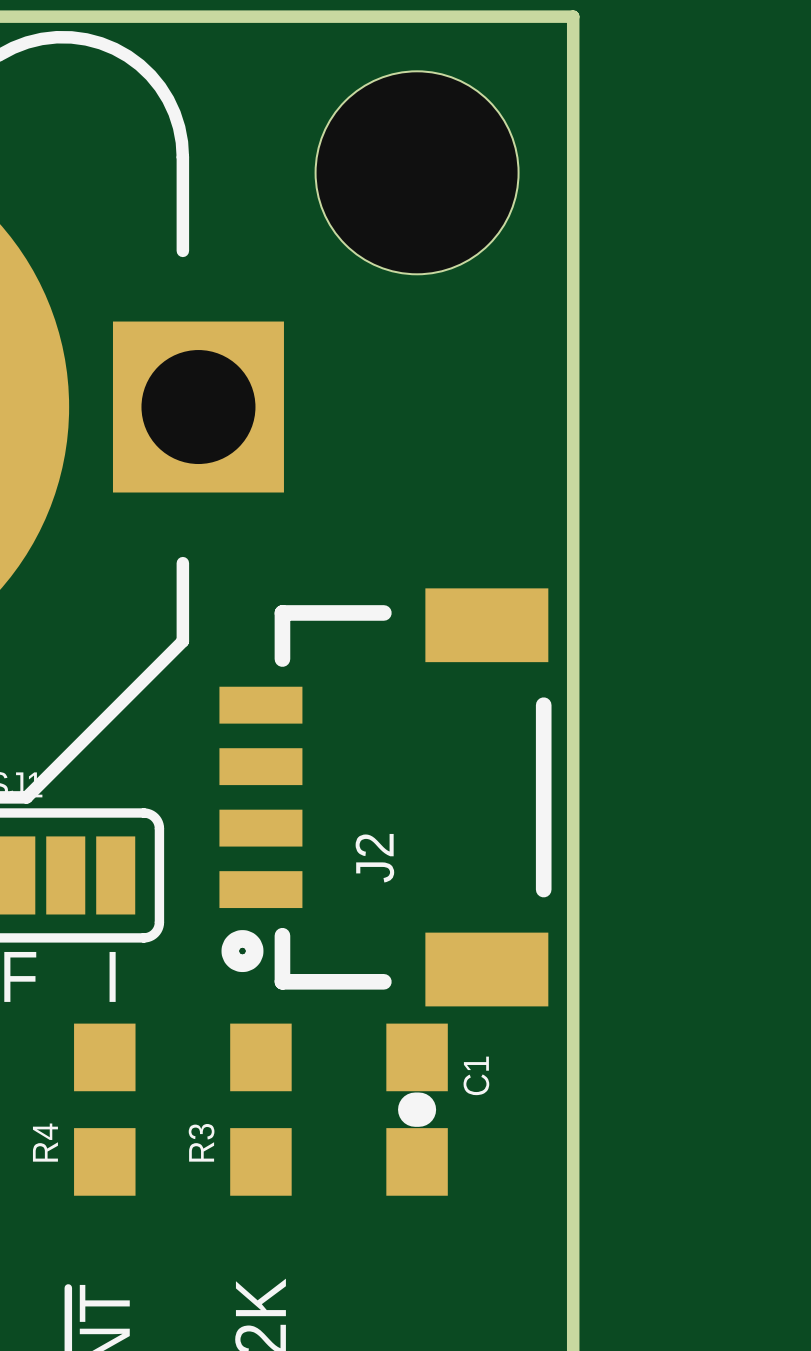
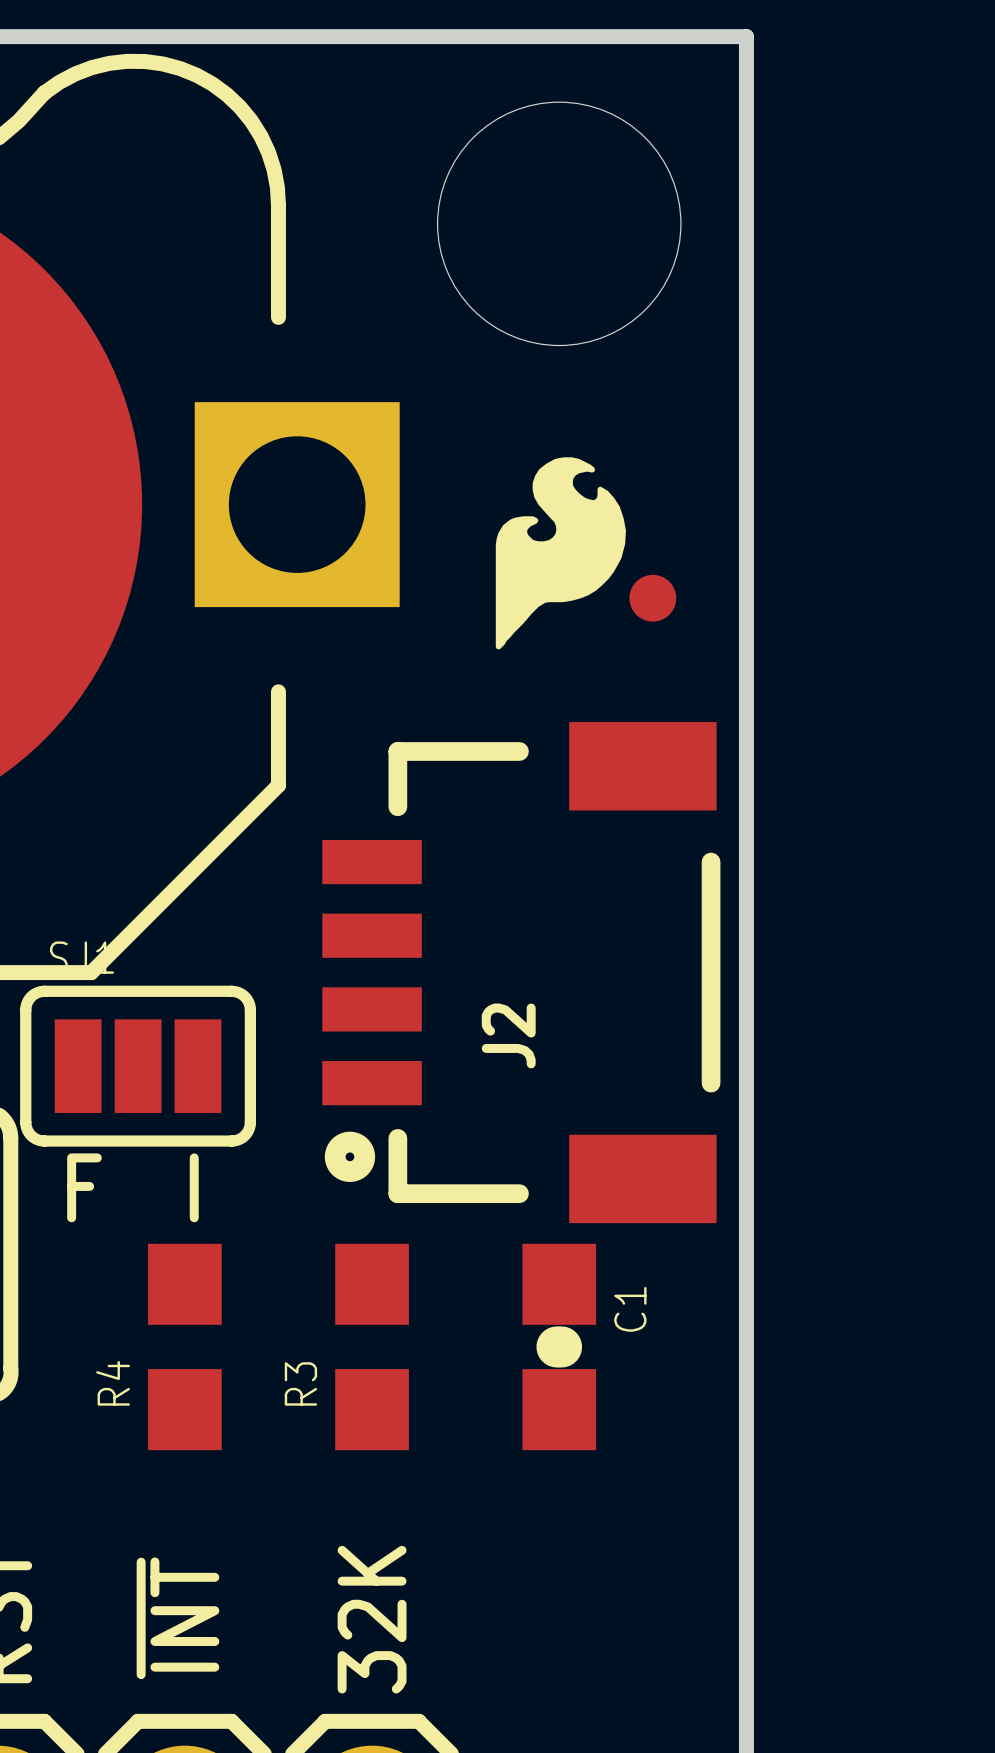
drawing: none -> [495, 457, 626, 650]
part: none -> (652, 598)

